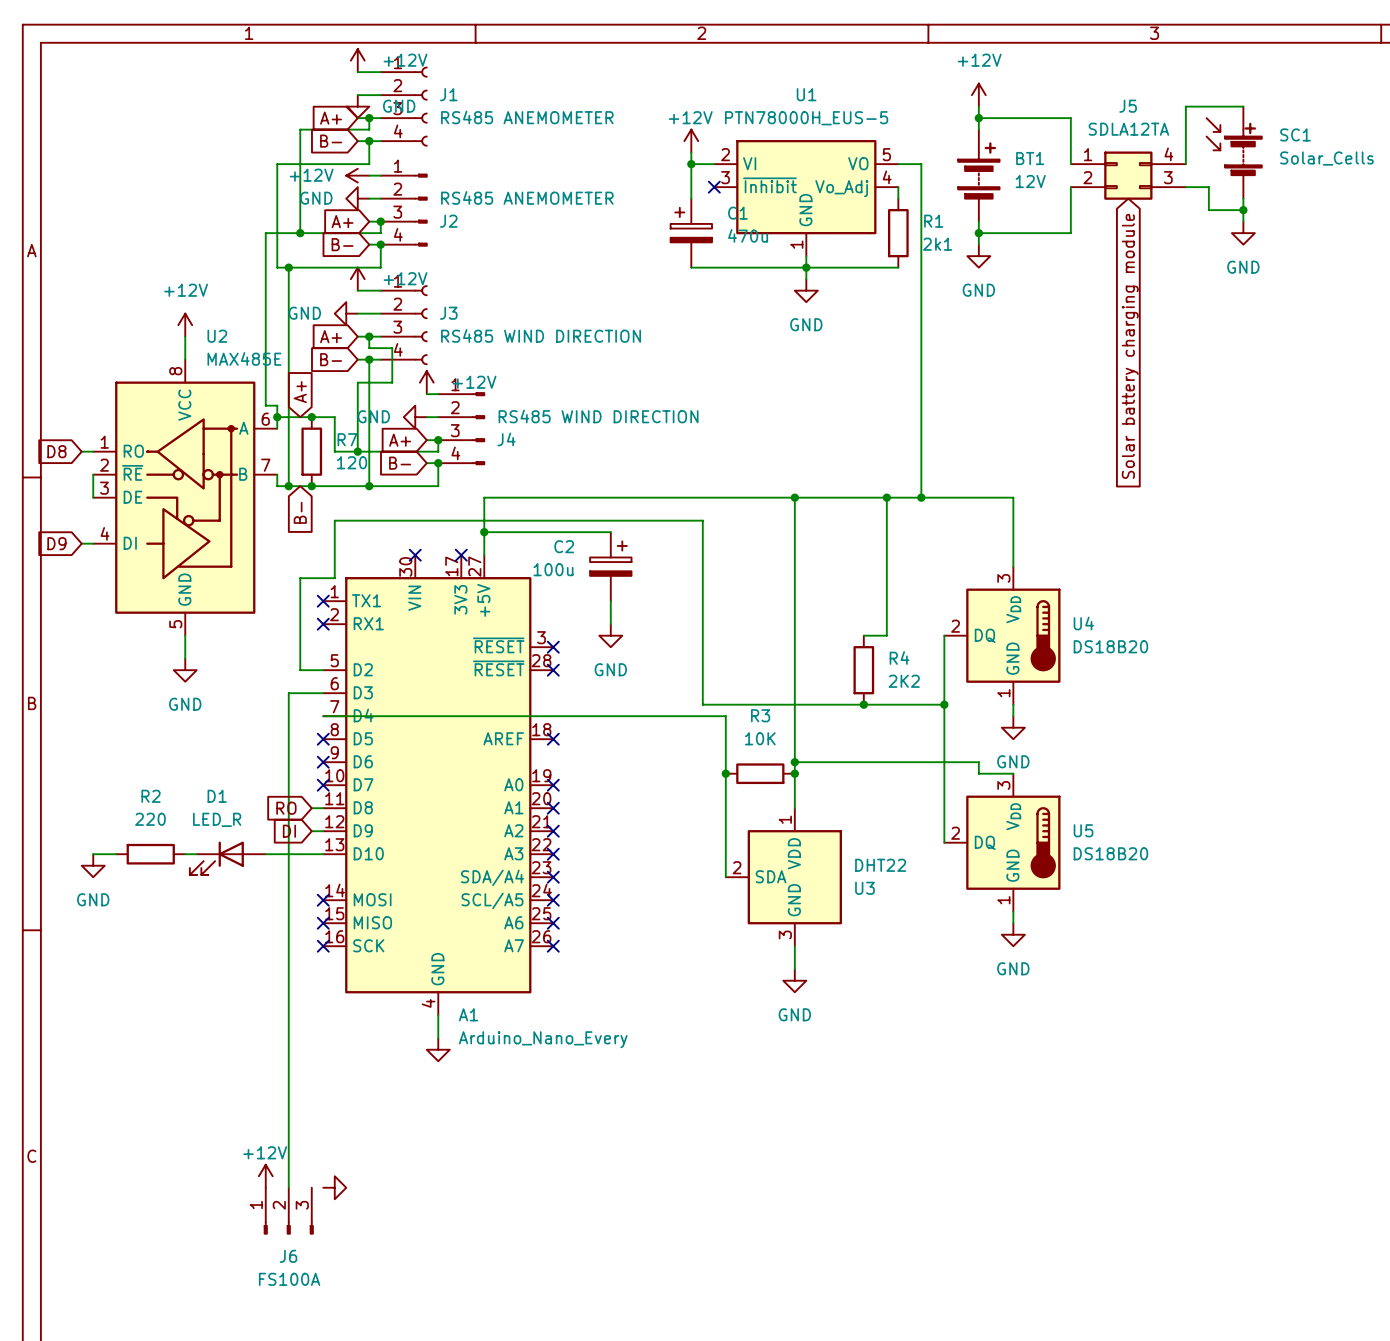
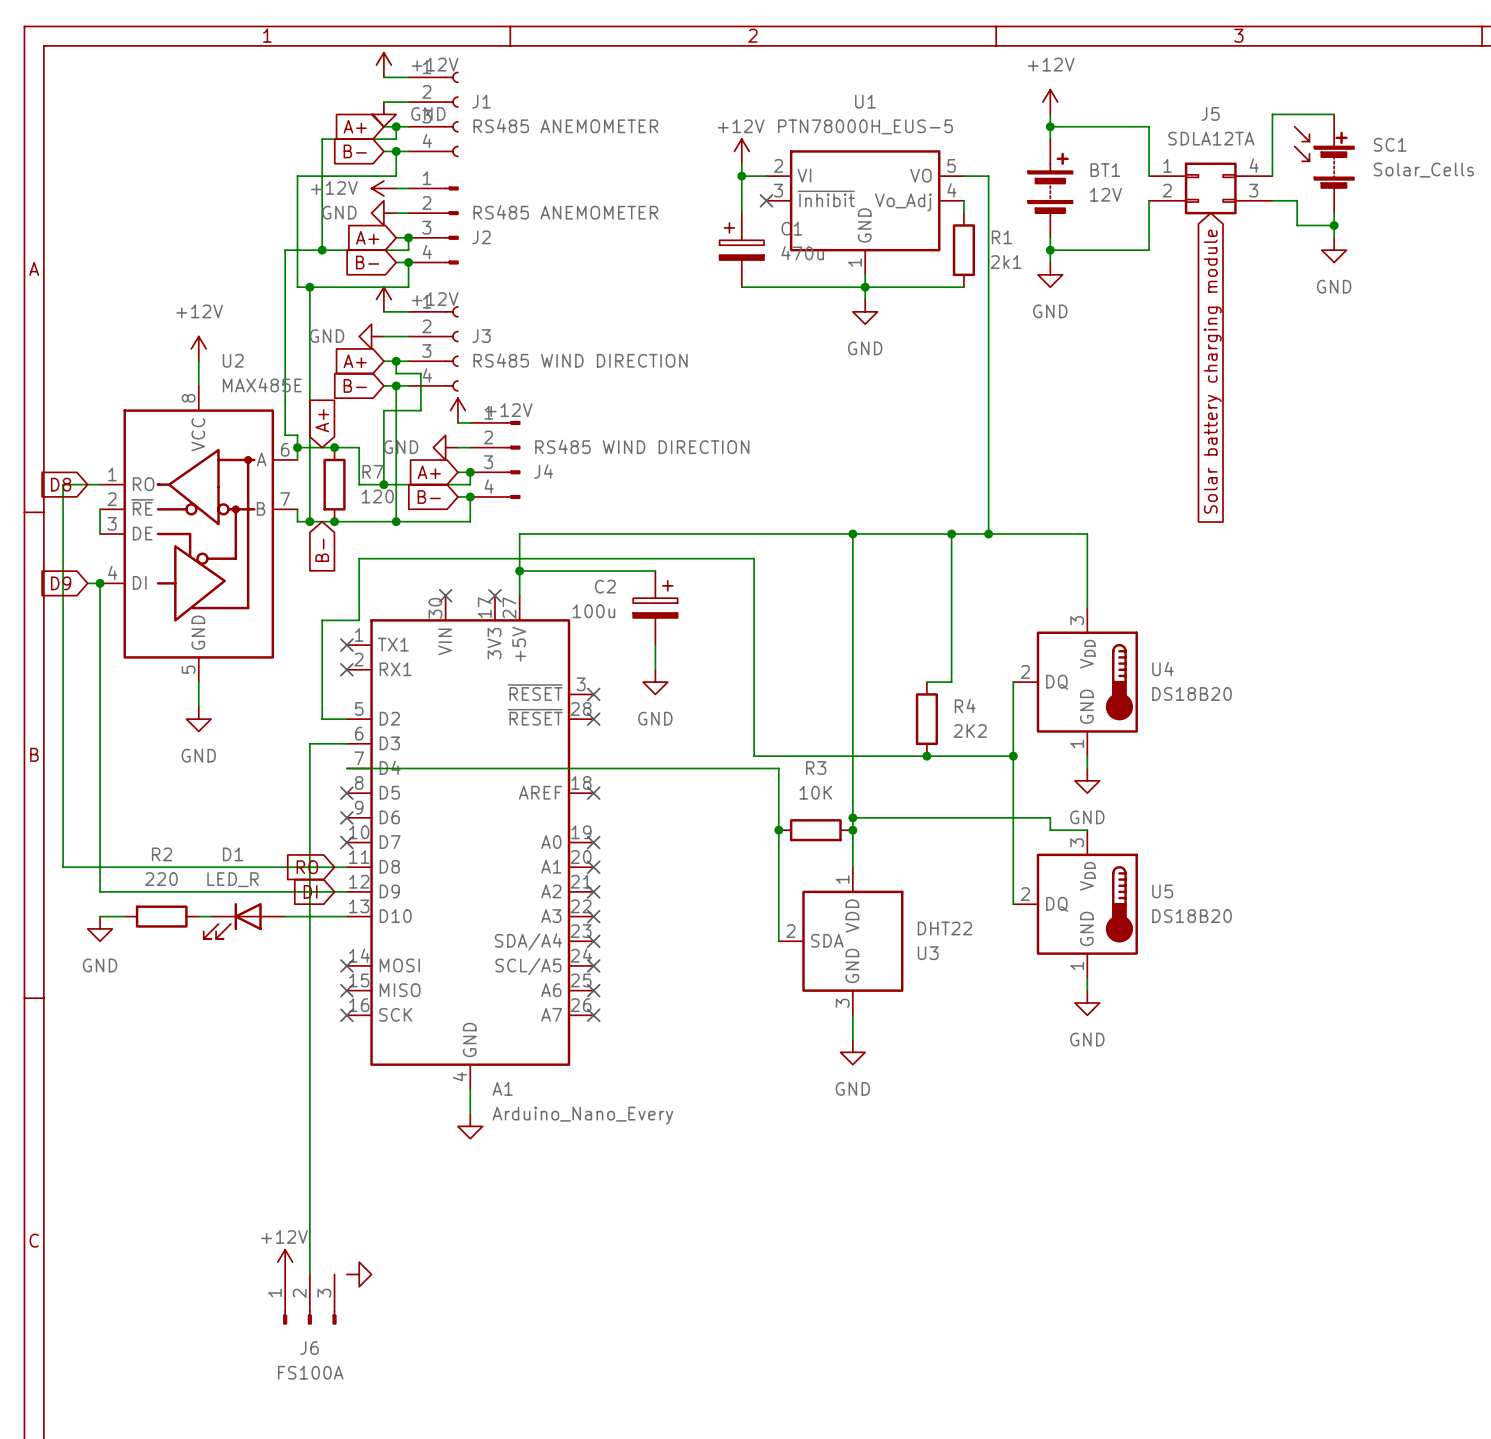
wire: none -> (87, 484) (63, 484) (63, 867) (334, 867)
wire: none -> (100, 583) (100, 891) (334, 891)
junction: none -> (100, 583)

